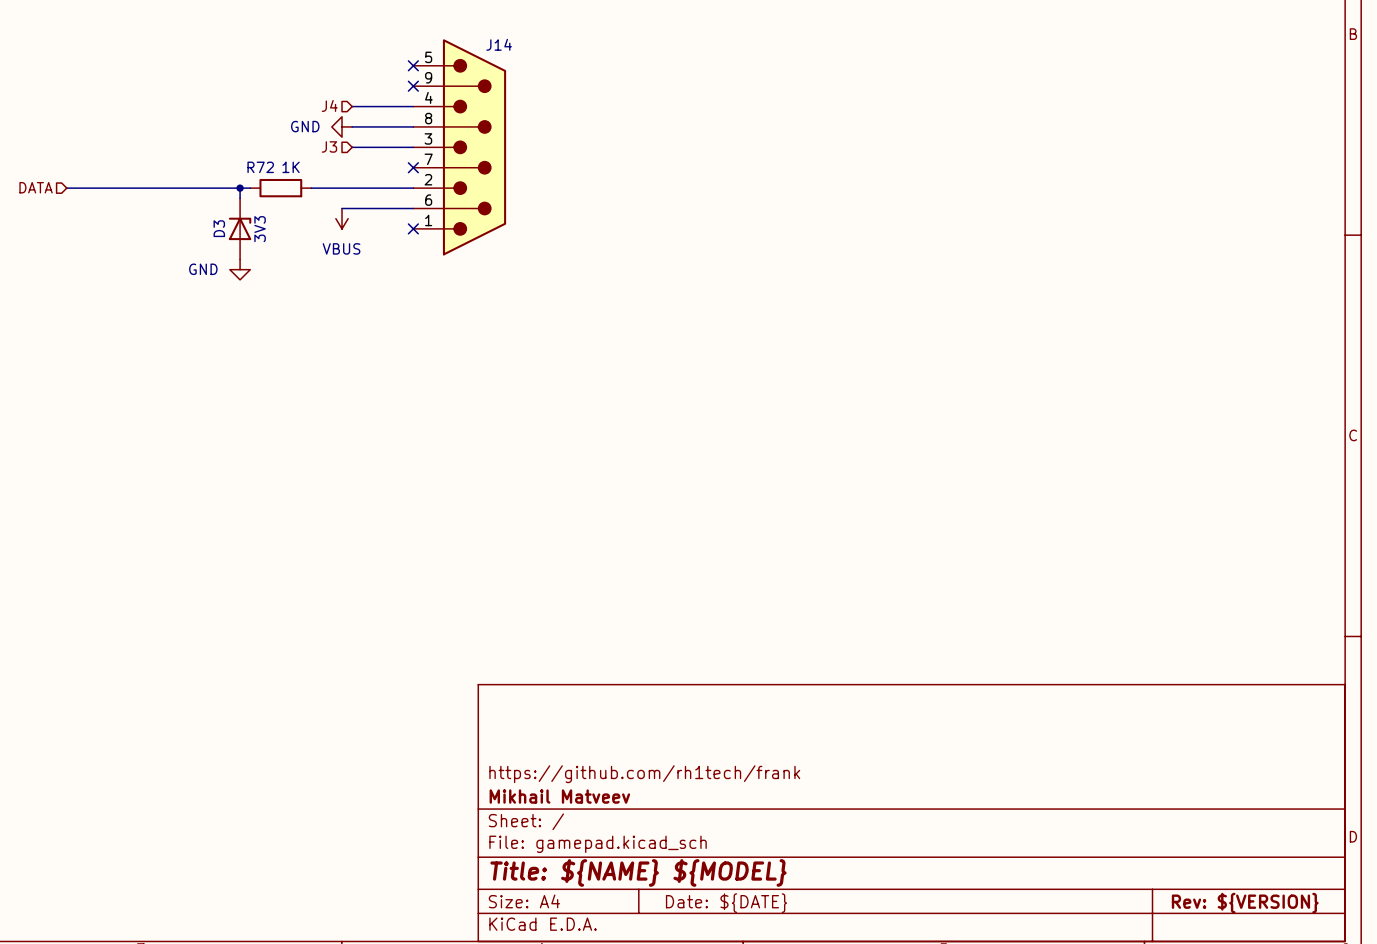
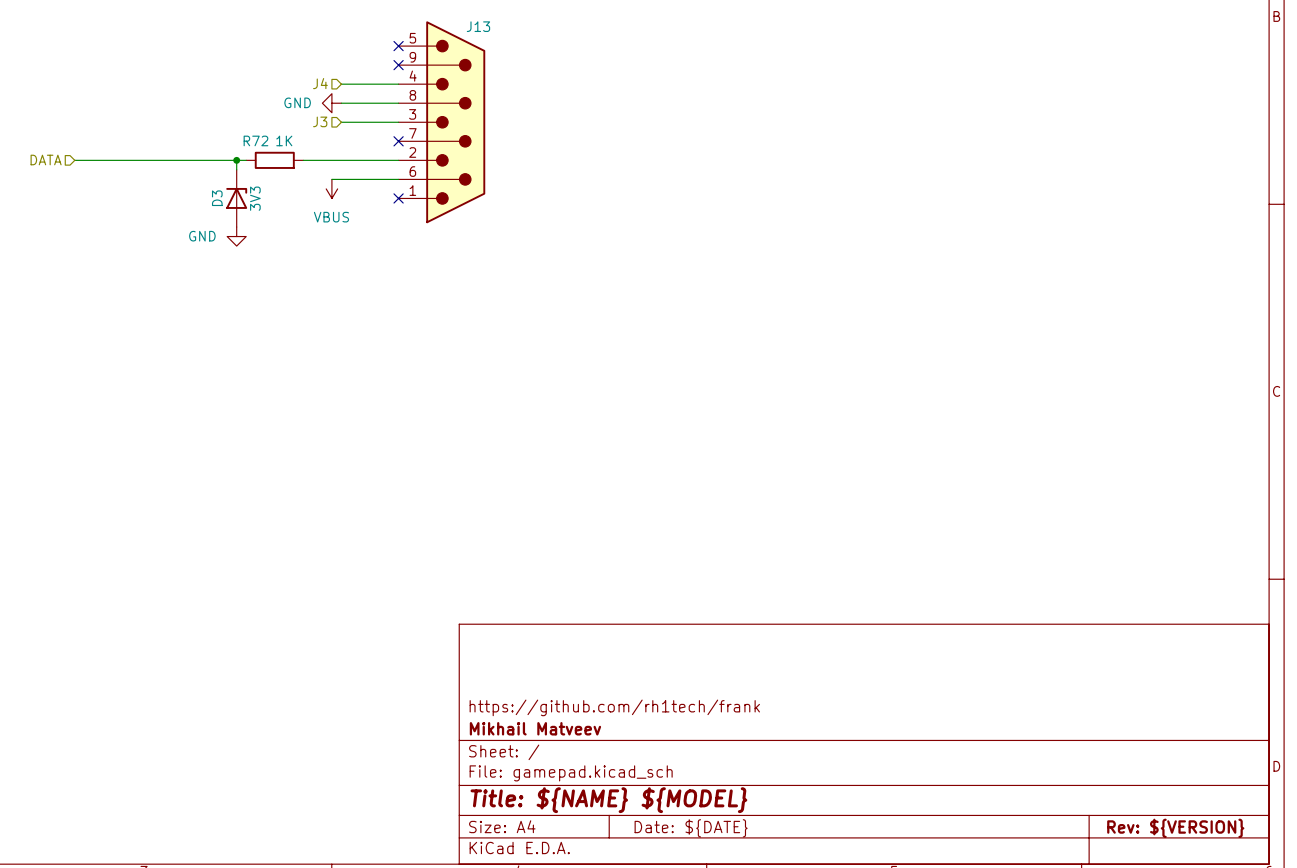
J14 name: J14 (499, 44) -> J13 (478, 26)

